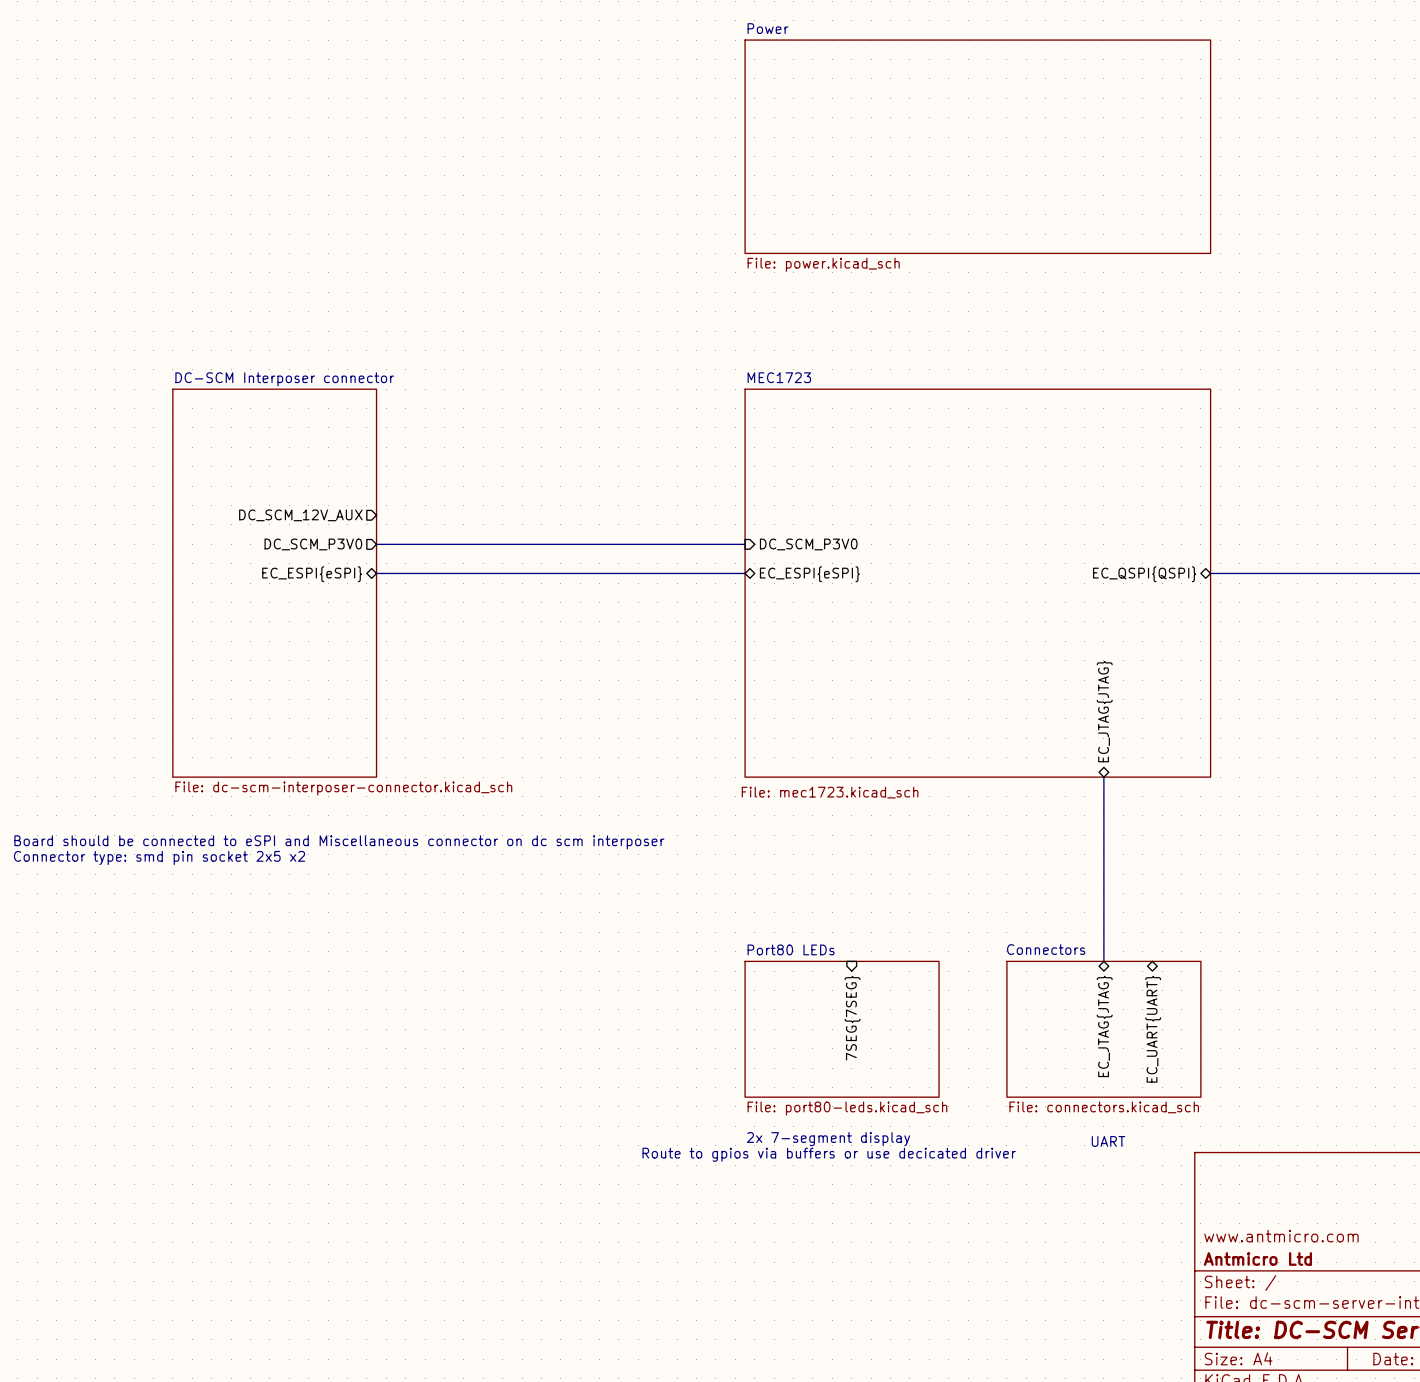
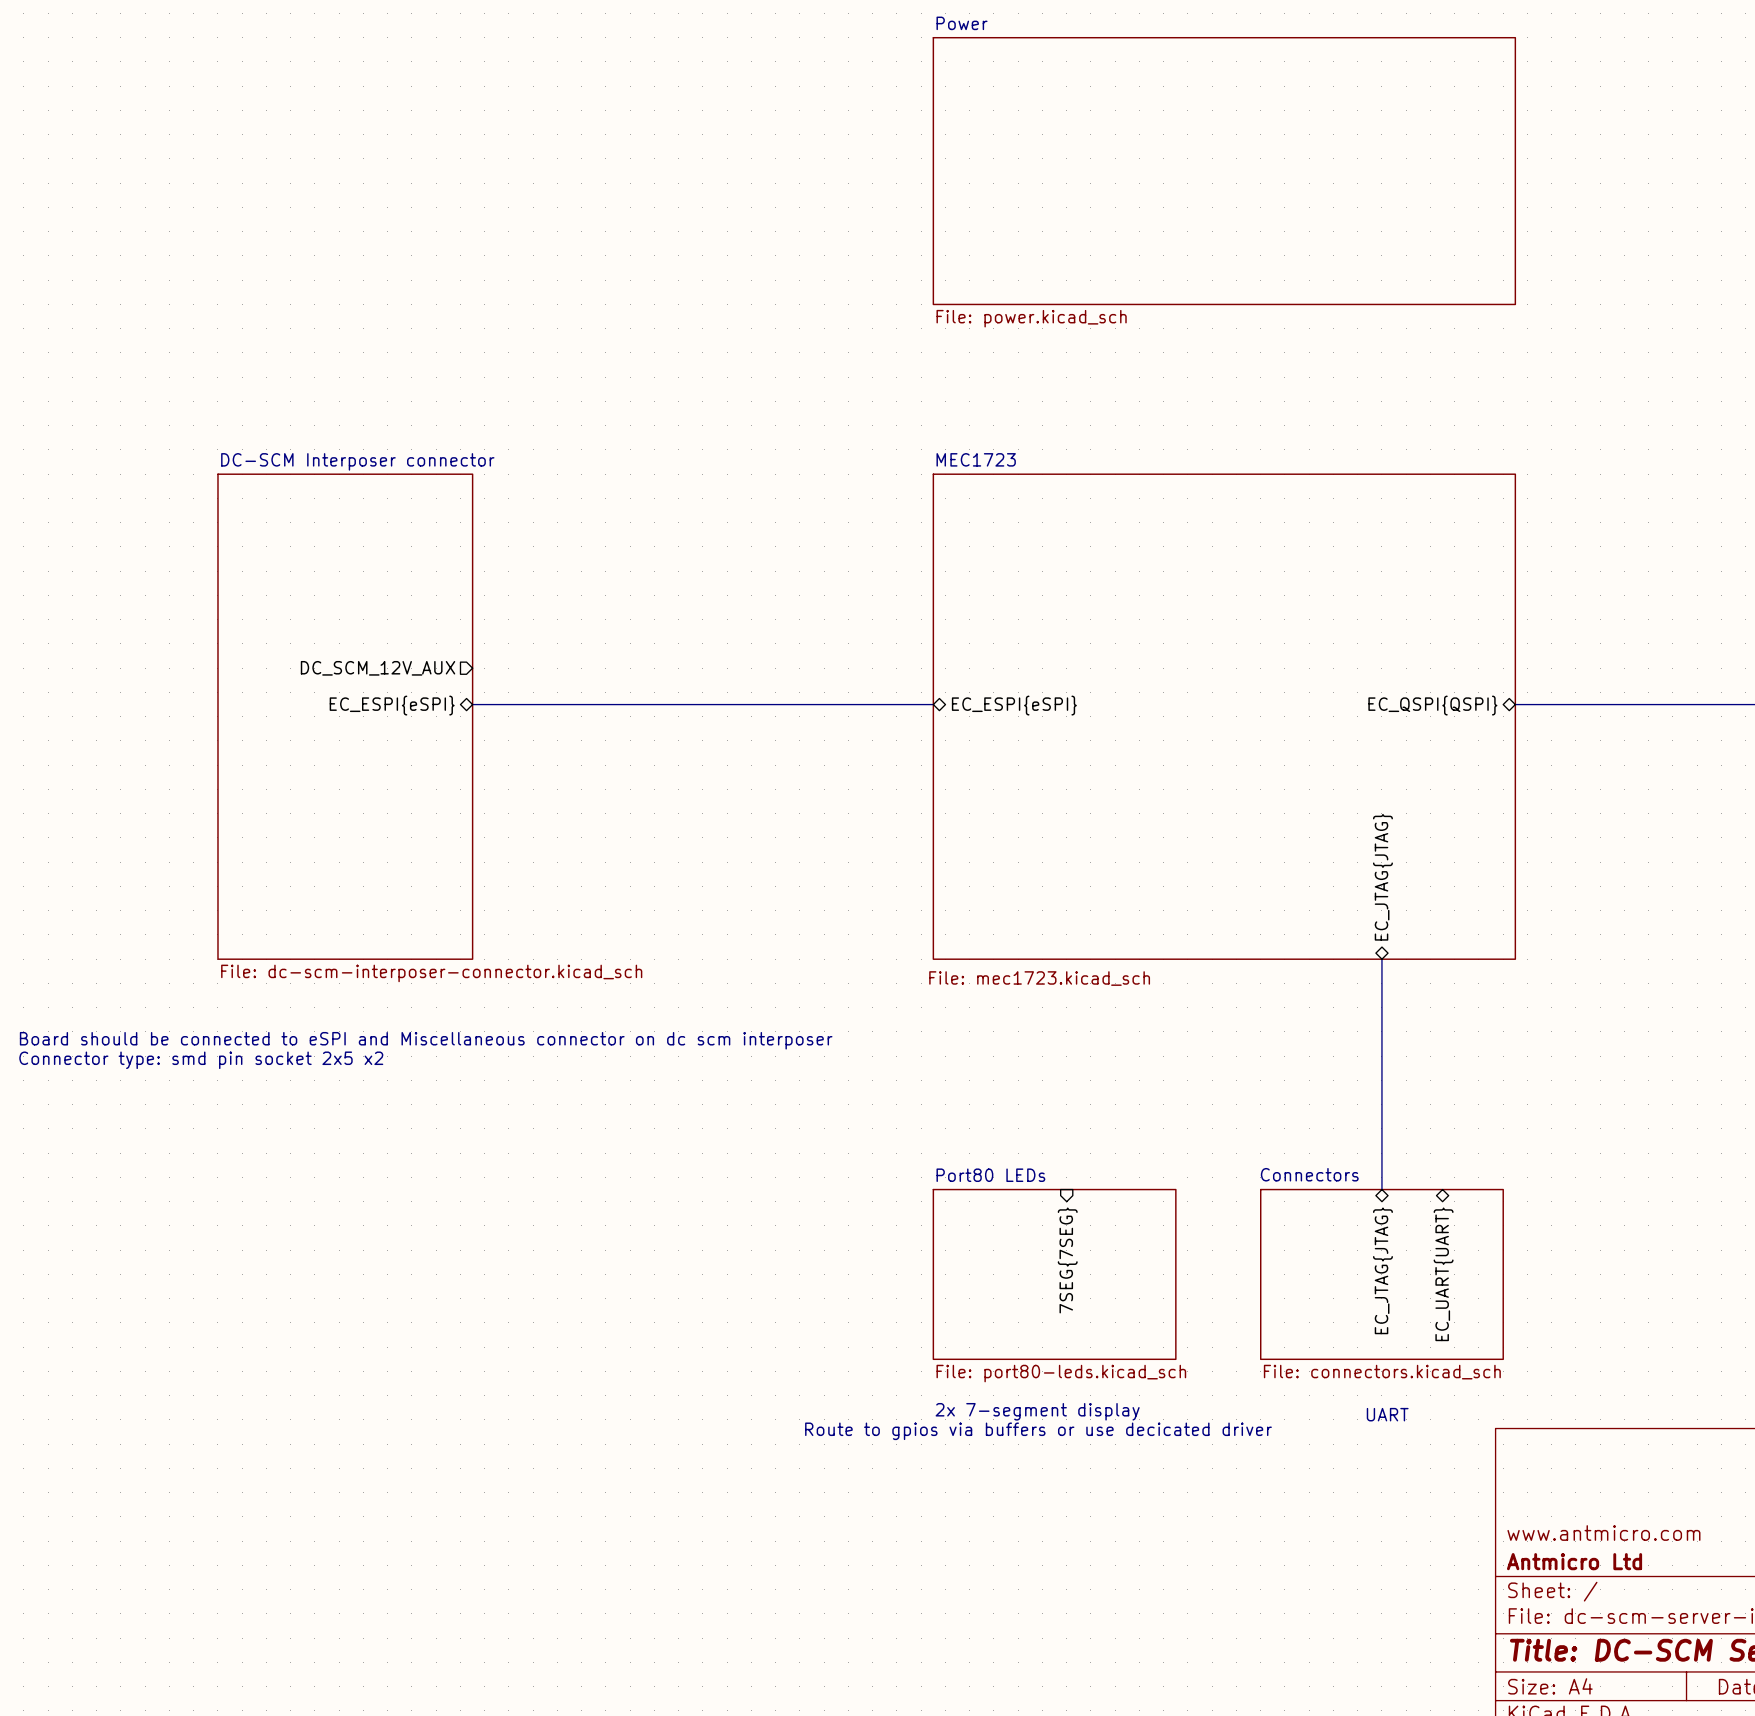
sheet pin: DC_SCM_12V_AUX (300, 515) -> none
sheet pin: DC_SCM_P3V0 (313, 544) -> DC_SCM_12V_AUX (378, 668)
wire: (376, 544) (745, 544) -> none
sheet pin: DC_SCM_P3V0 (808, 544) -> none

